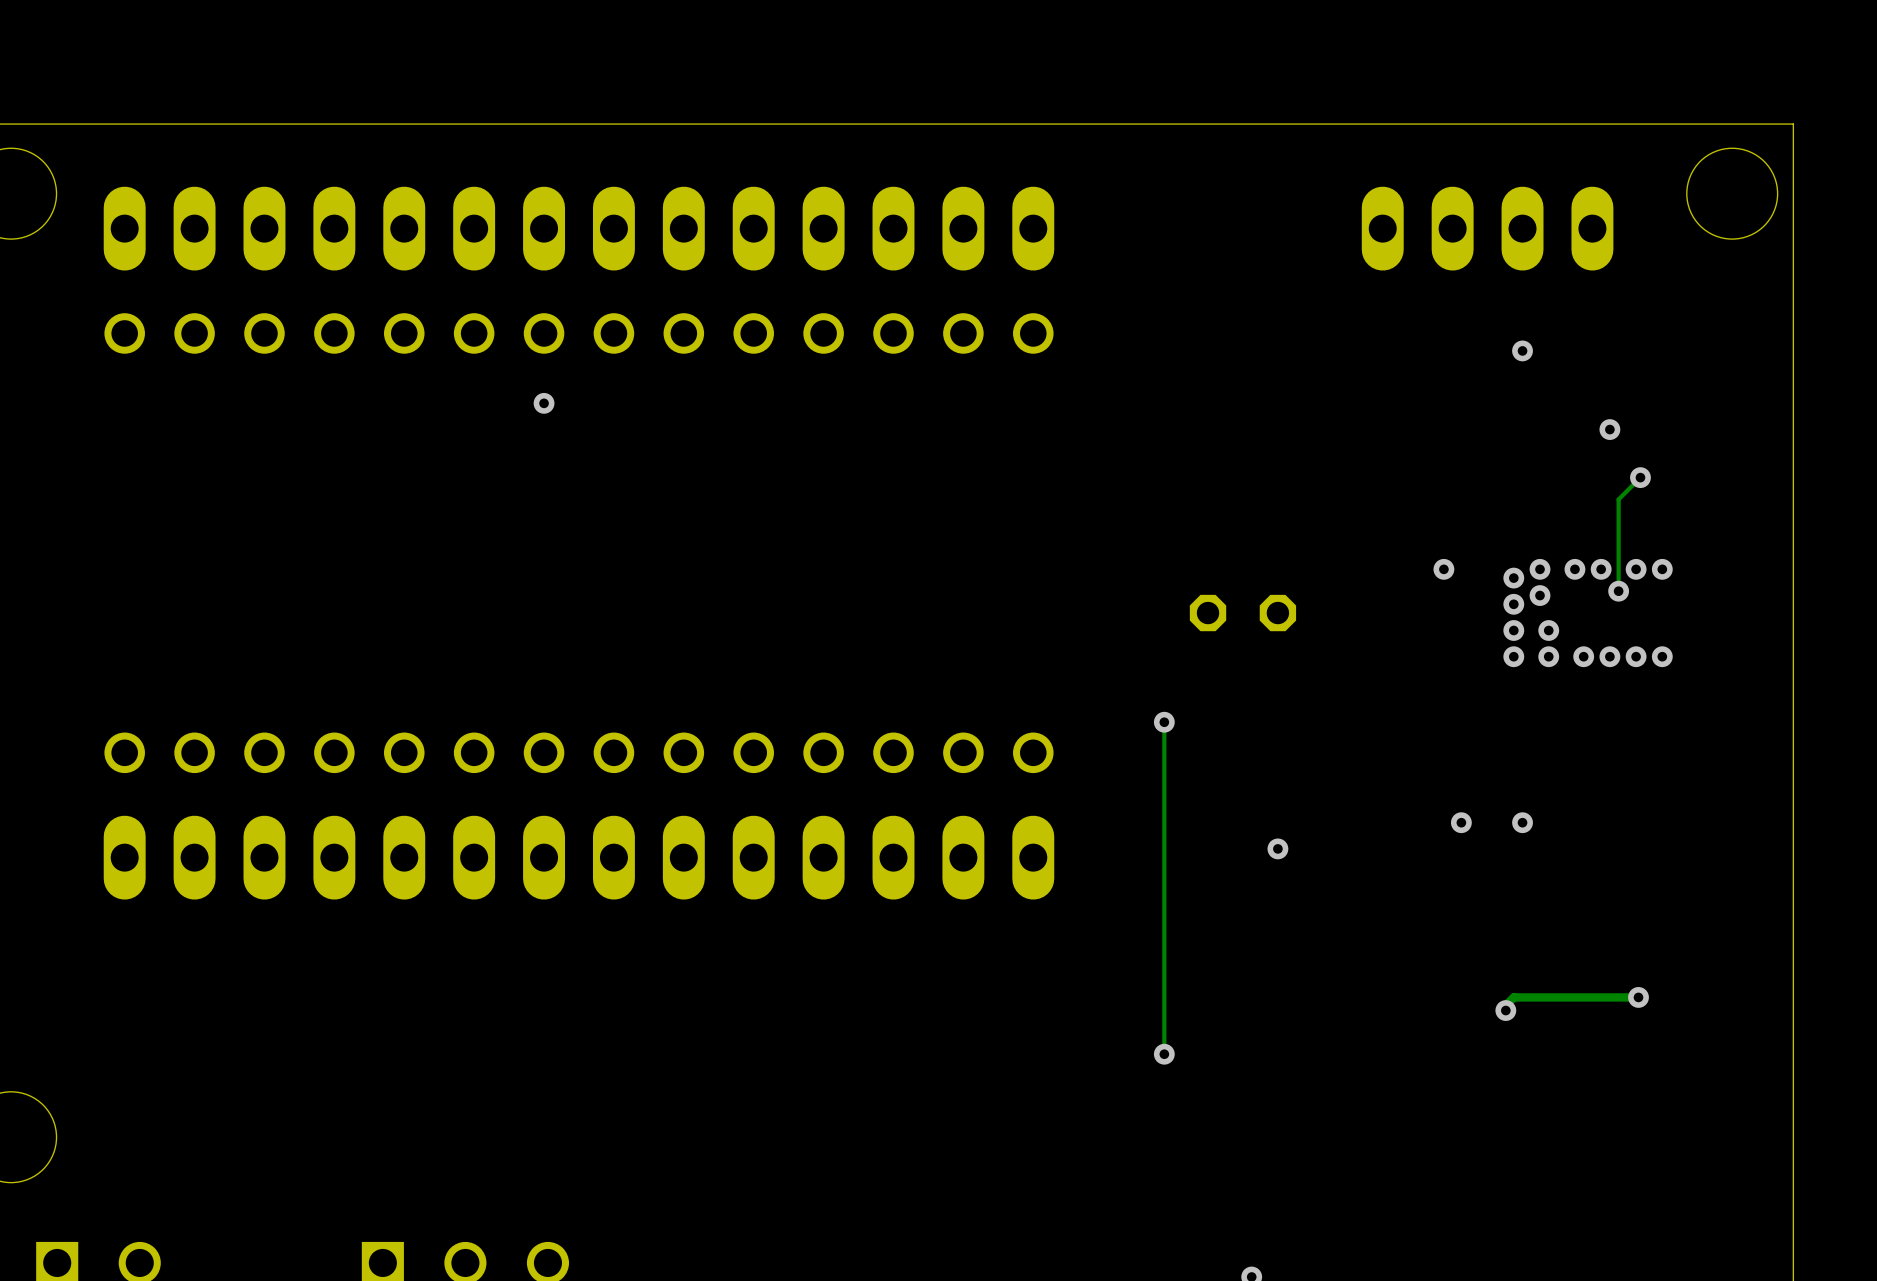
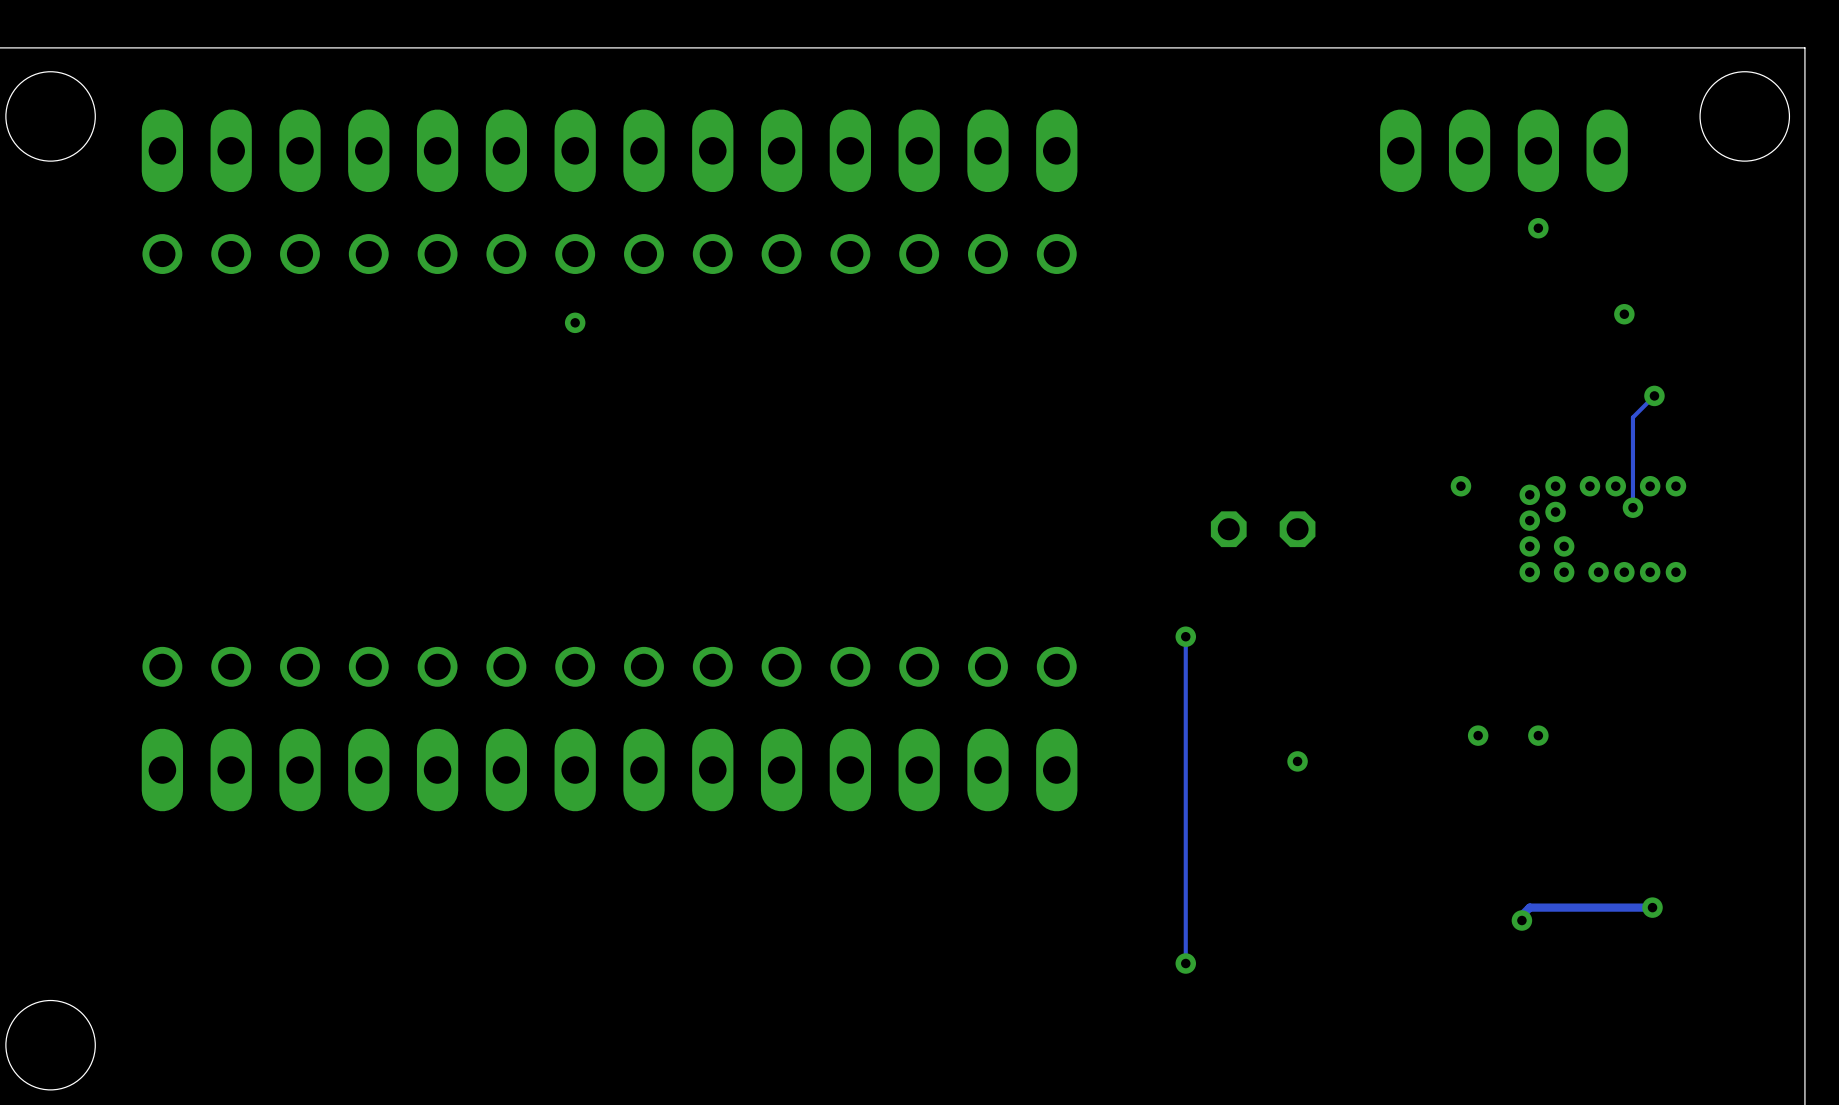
via position: (1522, 350) -> (1538, 228)
via position: (1609, 429) -> (1624, 314)

